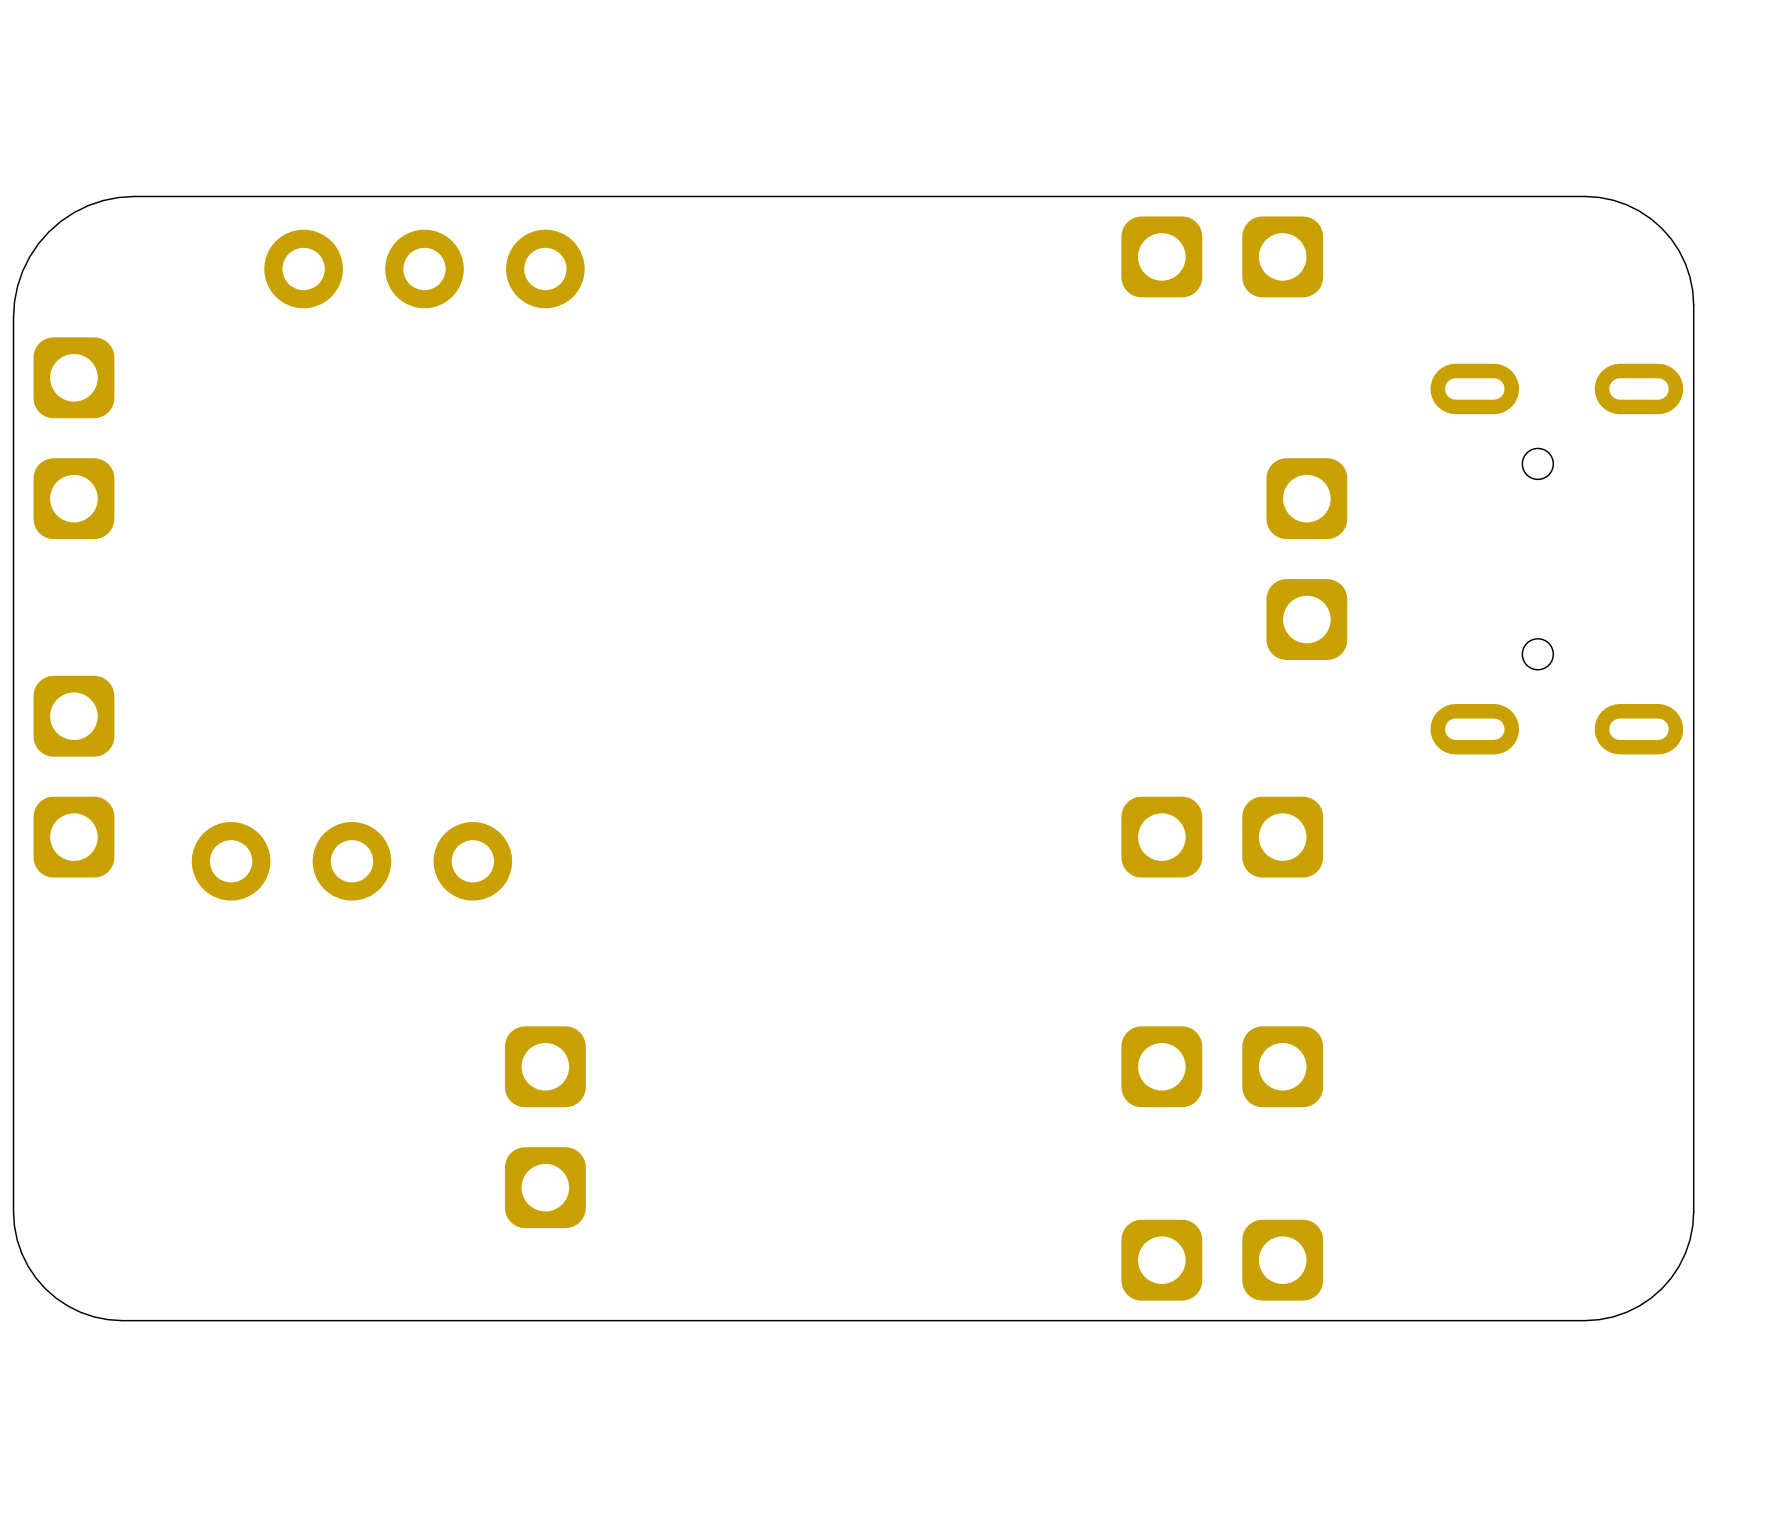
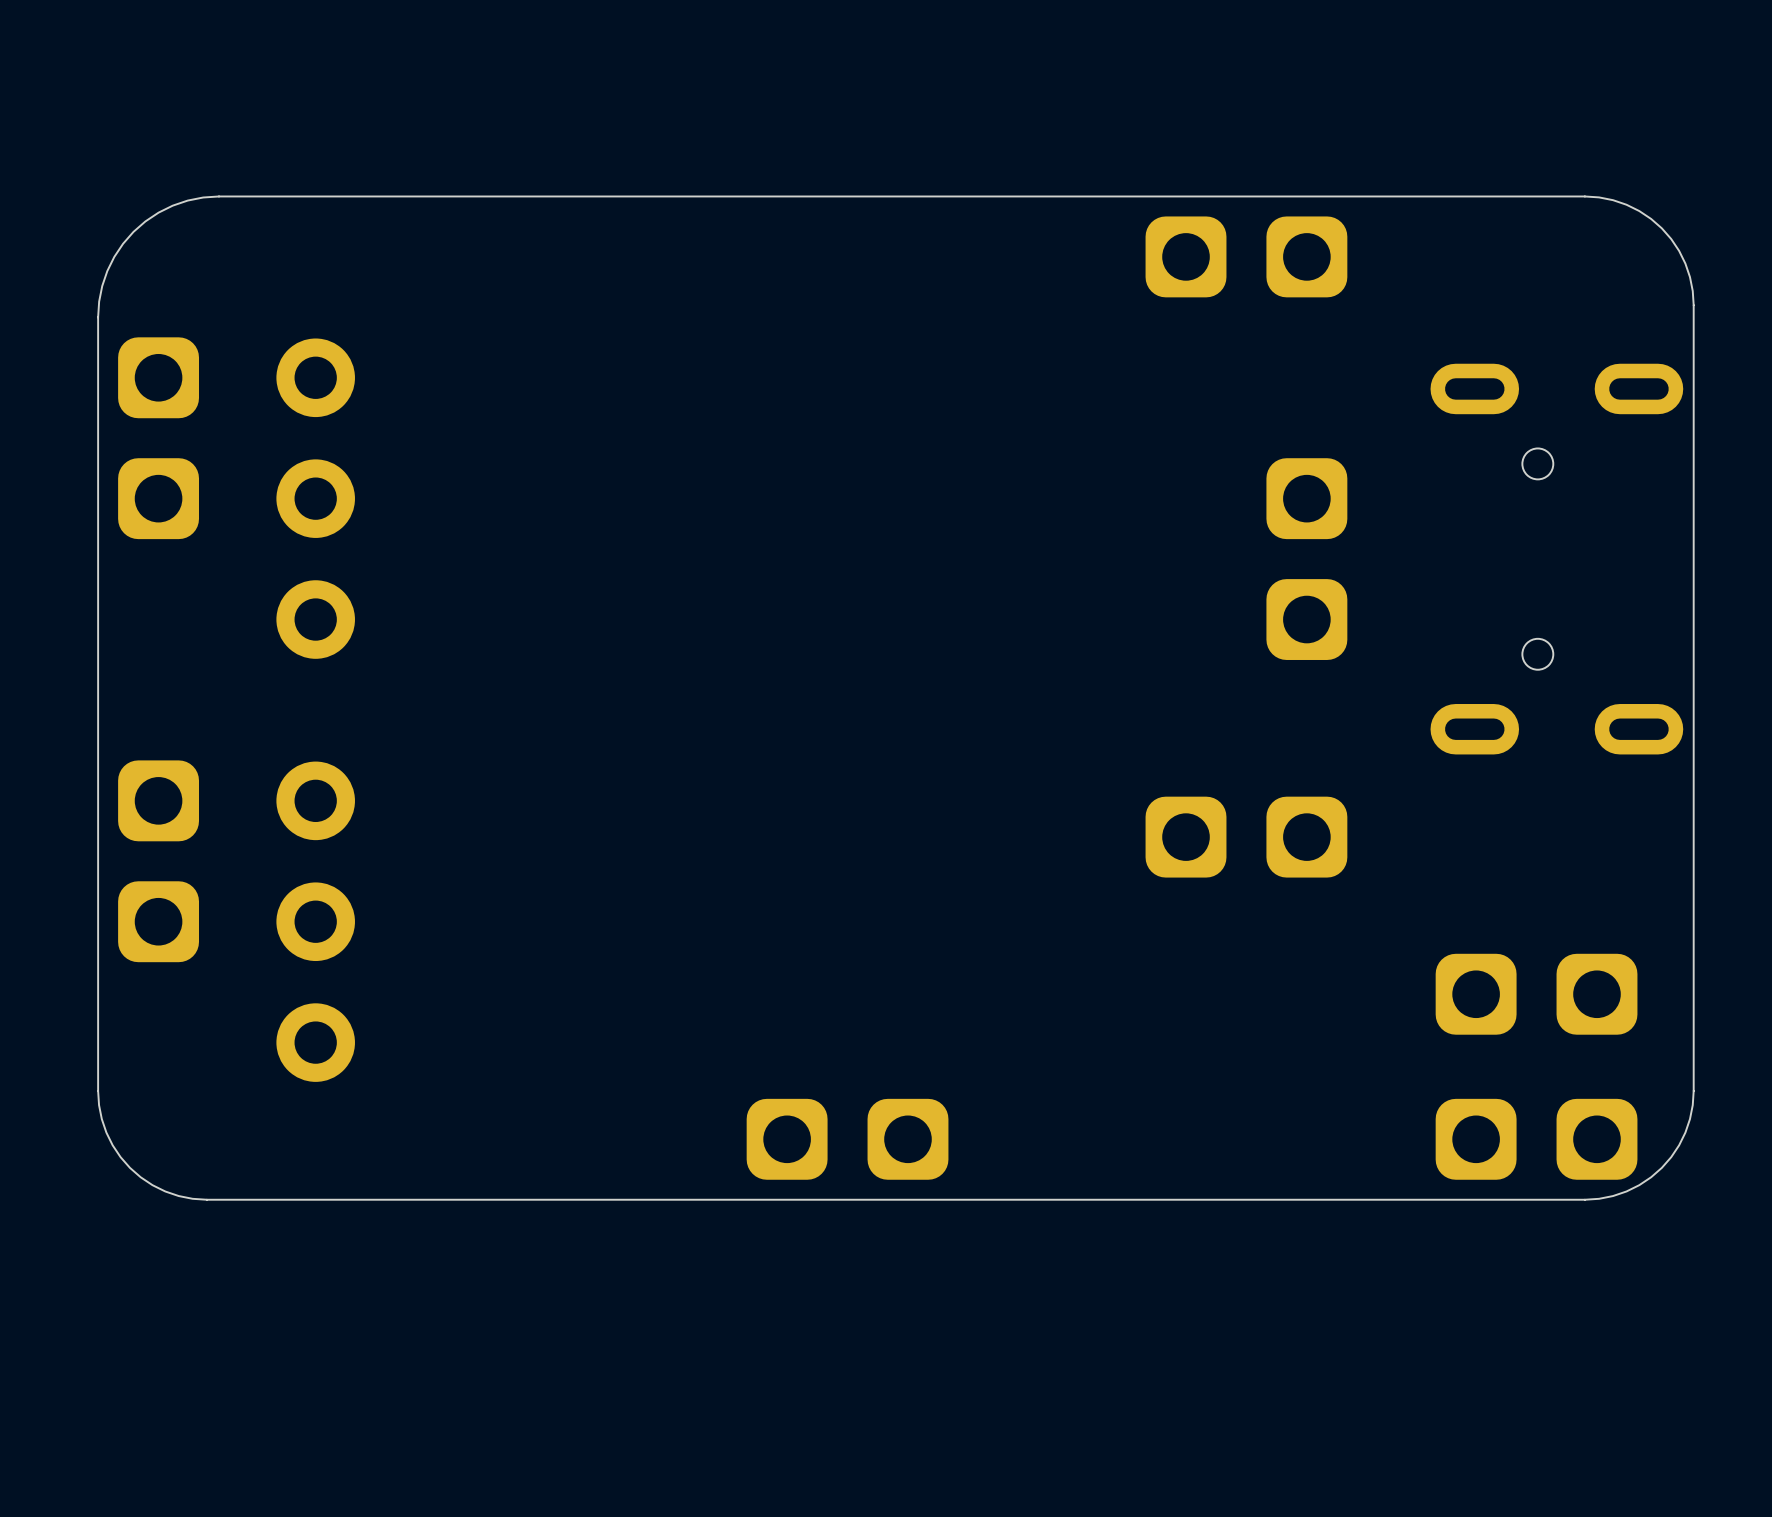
board edge: (218, 196) (118, 197) (103, 200) (73, 212) (48, 231) (29, 256) (17, 286) (14, 301) (13, 1211) (17, 1239) (28, 1266) (45, 1288) (67, 1306) (94, 1316) (122, 1320) (1599, 1319) (1626, 1312) (1651, 1298) (1671, 1278) (1685, 1253) (1689, 1239) (1693, 1211) (1693, 1090) -> (218, 196) (187, 200) (172, 205) (158, 212) (133, 231) (114, 256) (102, 286) (99, 301) (98, 1090) (101, 1119) (112, 1145) (129, 1167) (152, 1185) (178, 1196) (206, 1199) (1584, 1199) (1613, 1196) (1626, 1191) (1639, 1185) (1661, 1167) (1679, 1145) (1685, 1132) (1689, 1119) (1693, 1090)
part position: (1222, 256) -> (1246, 256)
part: (424, 268) -> none
part position: (73, 438) -> (158, 438)
part: none -> (315, 498)
part position: (73, 776) -> (158, 861)
part position: (1222, 837) -> (1246, 837)
part rotation: 0° (351, 861) -> 90° clockwise (315, 921)
part: none -> (1536, 994)
part: (1222, 1066) -> none
part: (545, 1127) -> none
part: none -> (847, 1139)
part: none -> (1536, 1139)
part: (1222, 1260) -> none

